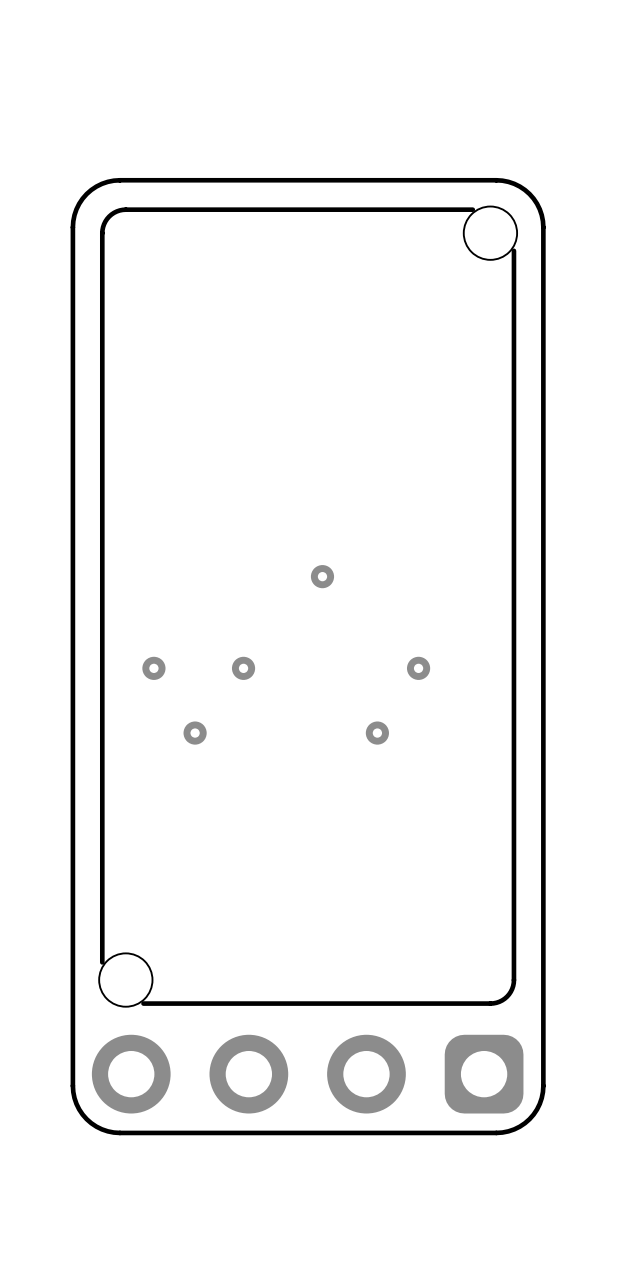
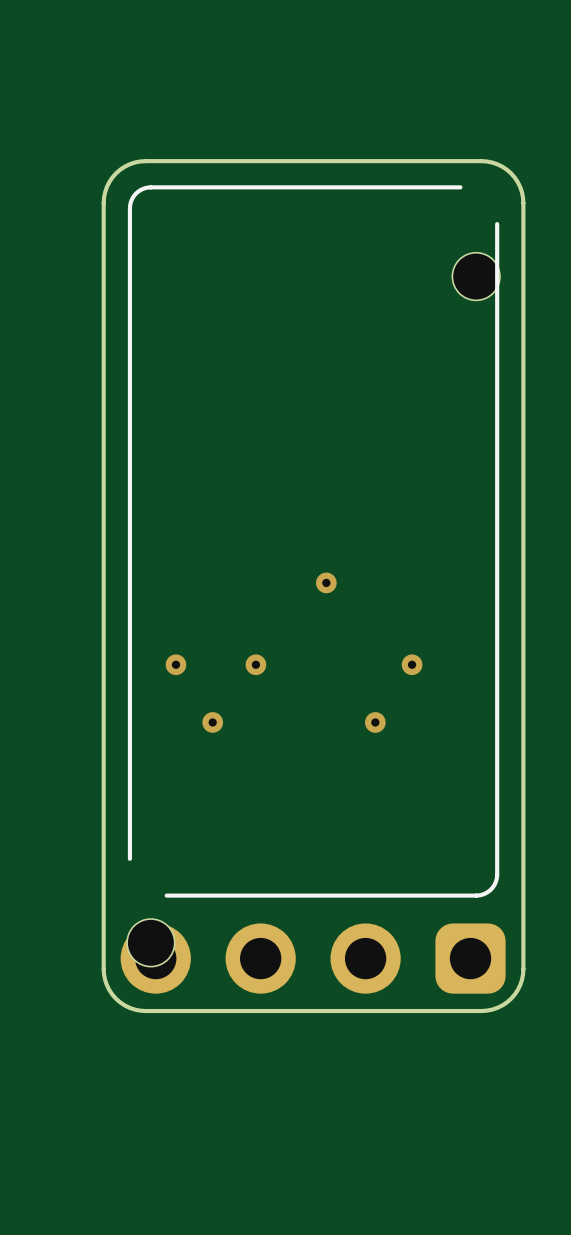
line: (472, 209) (125, 209) (116, 211) (109, 216) (104, 224) (102, 233) -> (460, 187) (145, 188) (134, 195) (130, 205) (129, 276)
board edge: (72, 227) (76, 209) (86, 194) (101, 183) (119, 180) (502, 180) (514, 183) (529, 194) (539, 209) (543, 227) -> (103, 271) (103, 203) (106, 187) (115, 173) (124, 166) (145, 161) (492, 162) (511, 173) (521, 192) (523, 271)
line: (102, 885) (102, 962) -> (497, 224) (497, 292)
line: (513, 903) (513, 983) (509, 994) (496, 1002) (143, 1003) -> (497, 874) (495, 882) (491, 889) (484, 894) (476, 895) (166, 895)
board edge: (72, 1009) (72, 1085) (76, 1103) (86, 1119) (96, 1126) (107, 1131) (119, 1132) (496, 1132) (508, 1131) (519, 1126) (529, 1119) (537, 1109) (541, 1098) (543, 1009) -> (103, 969) (106, 985) (115, 998) (129, 1007) (145, 1011) (486, 1010) (502, 1005) (514, 994) (520, 985) (523, 969)
part position: (307, 1074) -> (313, 958)

